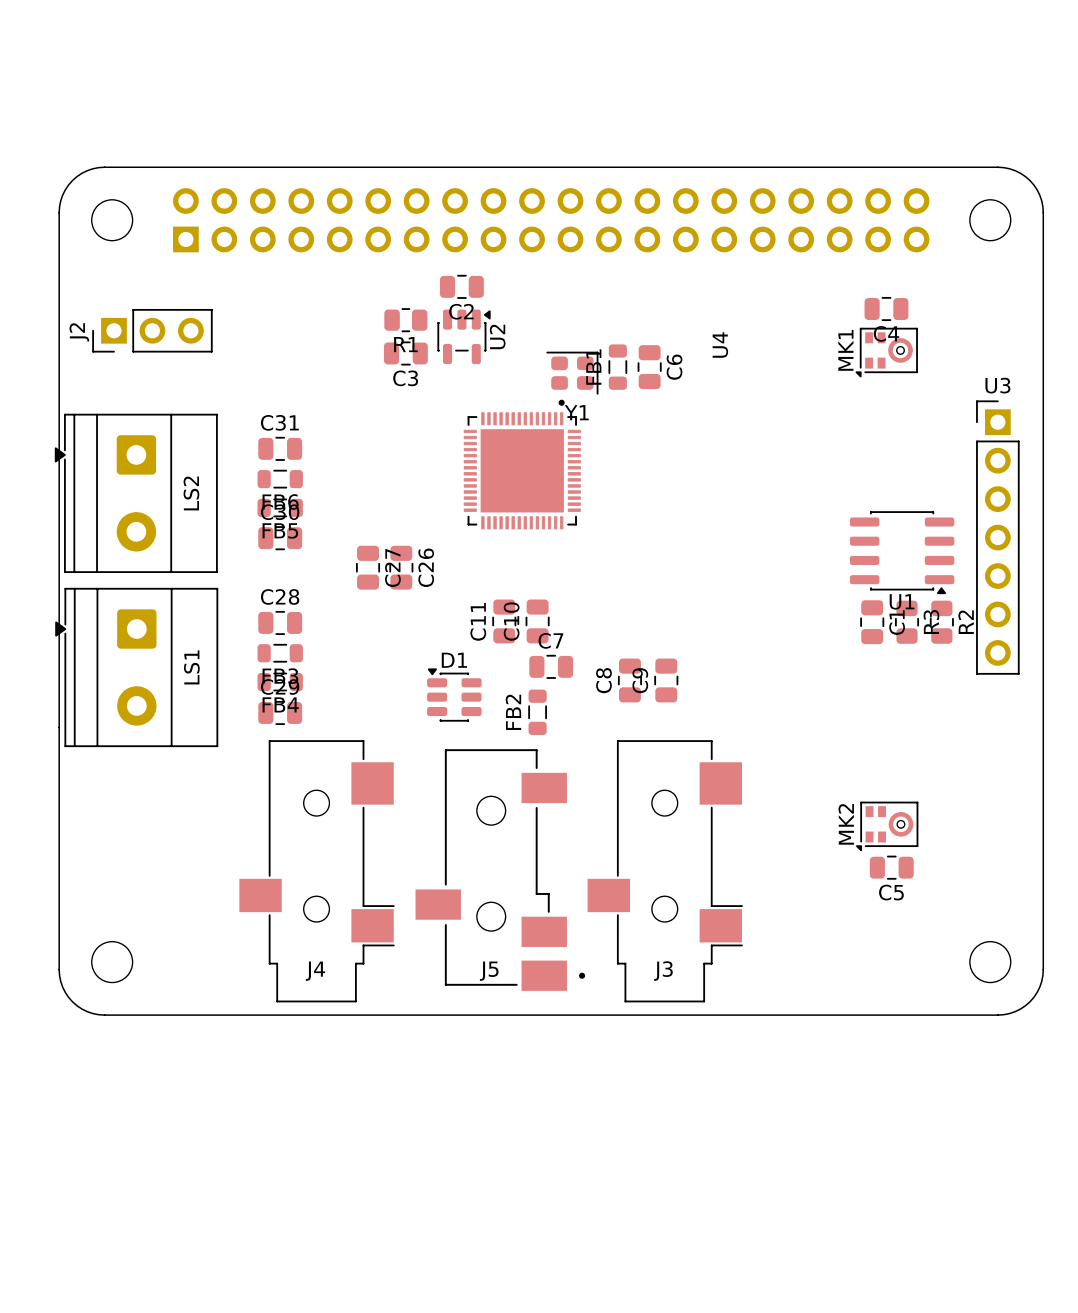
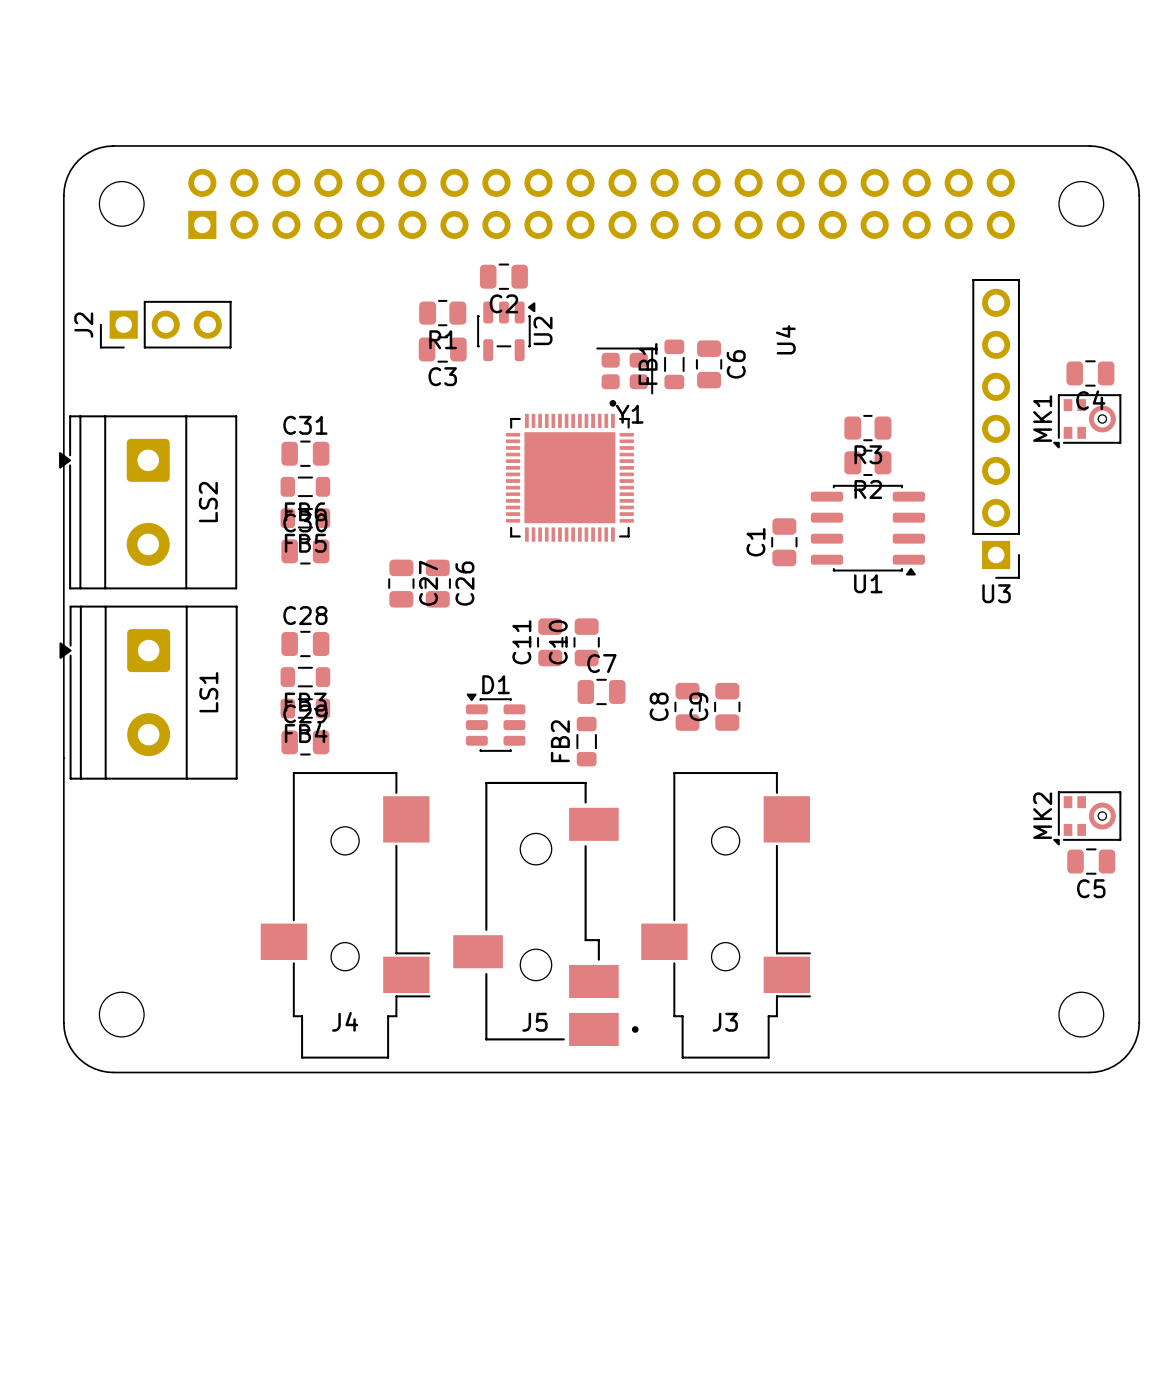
C4 position: (886, 309) -> (1090, 373)
MK1 position: (886, 352) -> (1087, 421)
U3 rotation: 0° (997, 537) -> 180° (996, 428)
U1 position: (902, 552) -> (867, 530)
C1 position: (872, 622) -> (784, 542)
C1 name position: C1 (897, 622) -> C1 (755, 542)
R3 rotation: 0° (907, 622) -> 90° clockwise (867, 428)
R3 position: (907, 622) -> (867, 428)
R2 rotation: 0° (941, 622) -> 90° clockwise (867, 462)
R2 position: (941, 622) -> (867, 462)
MK2 position: (887, 826) -> (1087, 818)
C5 position: (891, 867) -> (1091, 861)

